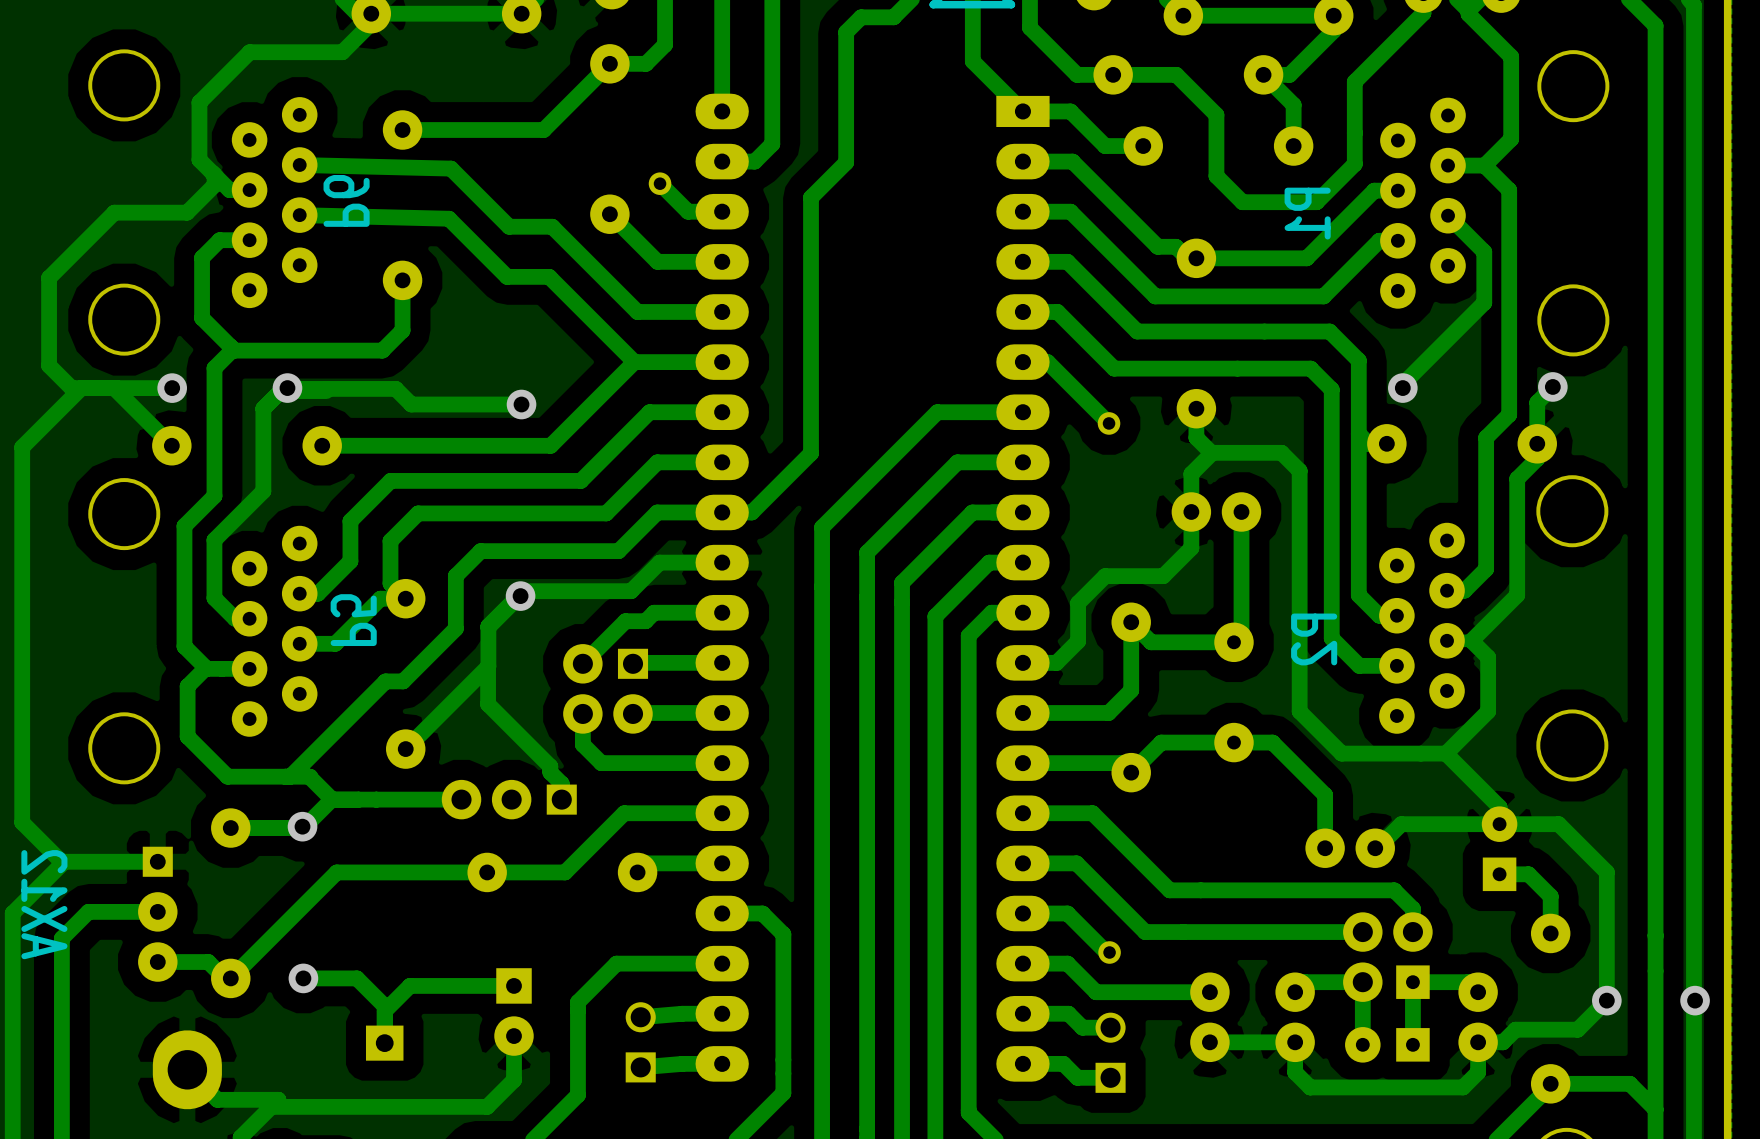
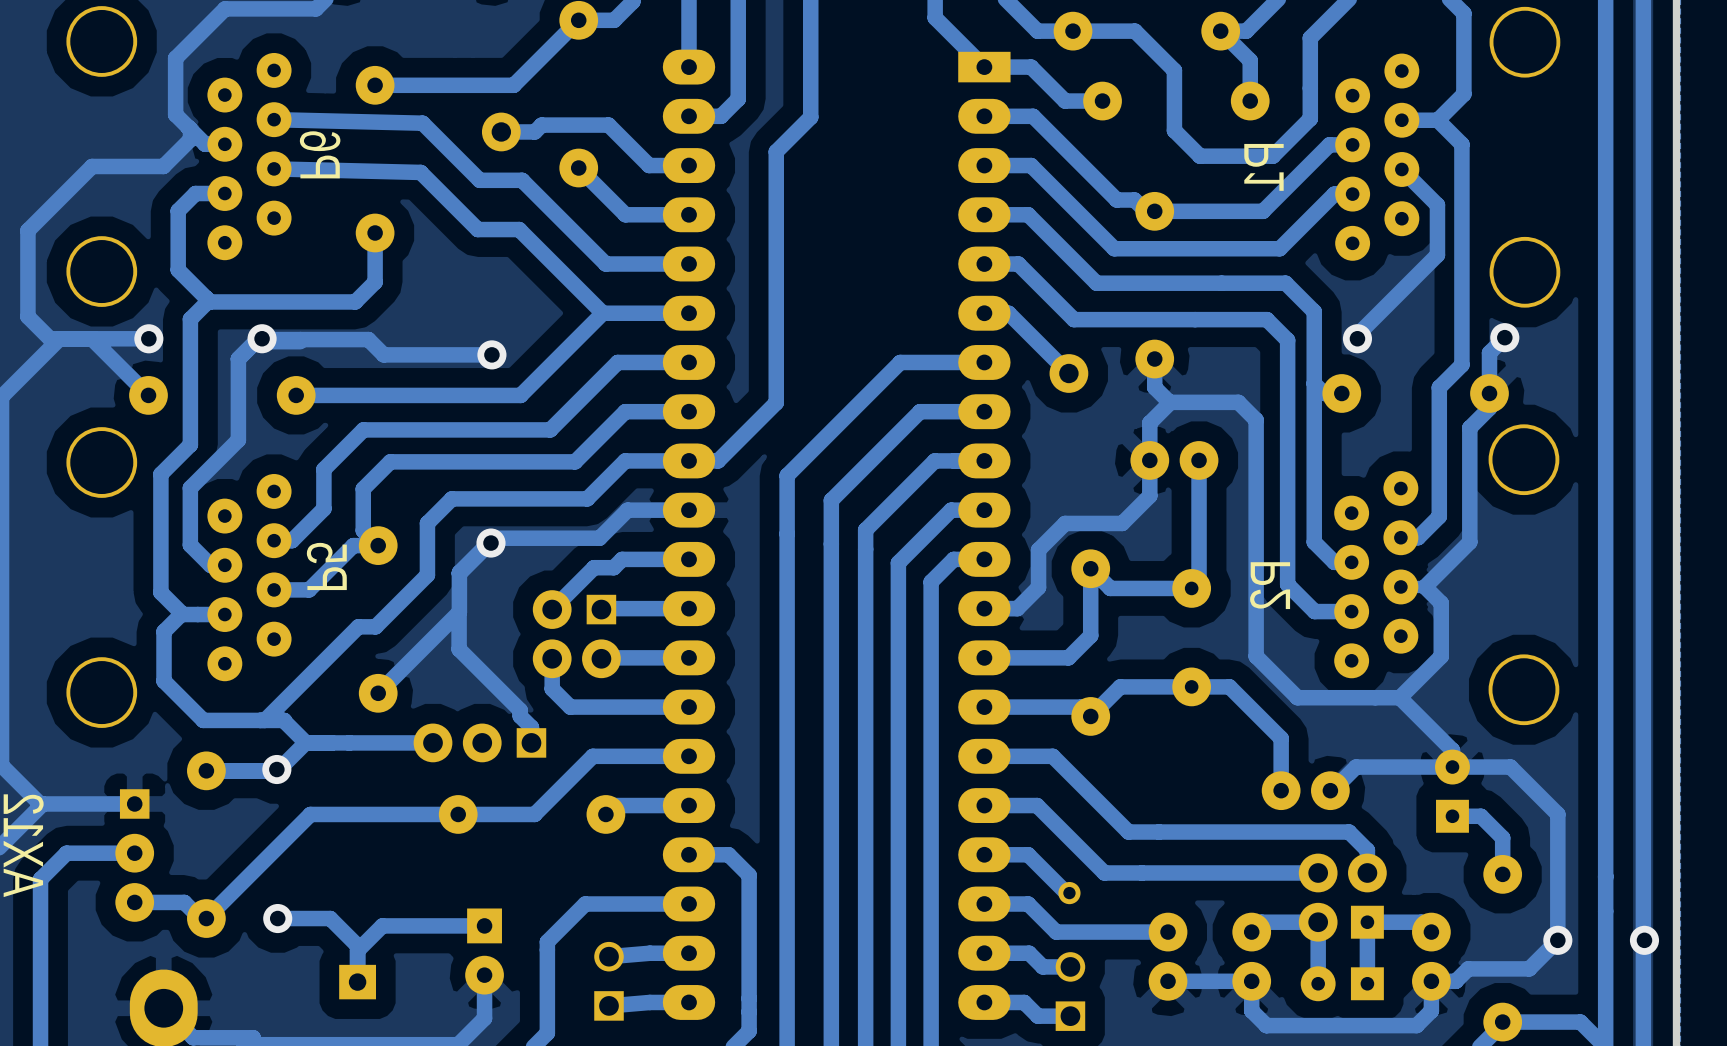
part: none -> (501, 131)
track: (660, 183) (688, 211) -> (501, 131) (534, 131) (541, 125) (608, 125) (649, 165) (655, 165)
part: (660, 183) -> none
part footprint: [1097, 412, 1121, 435] -> [1049, 354, 1089, 393]

